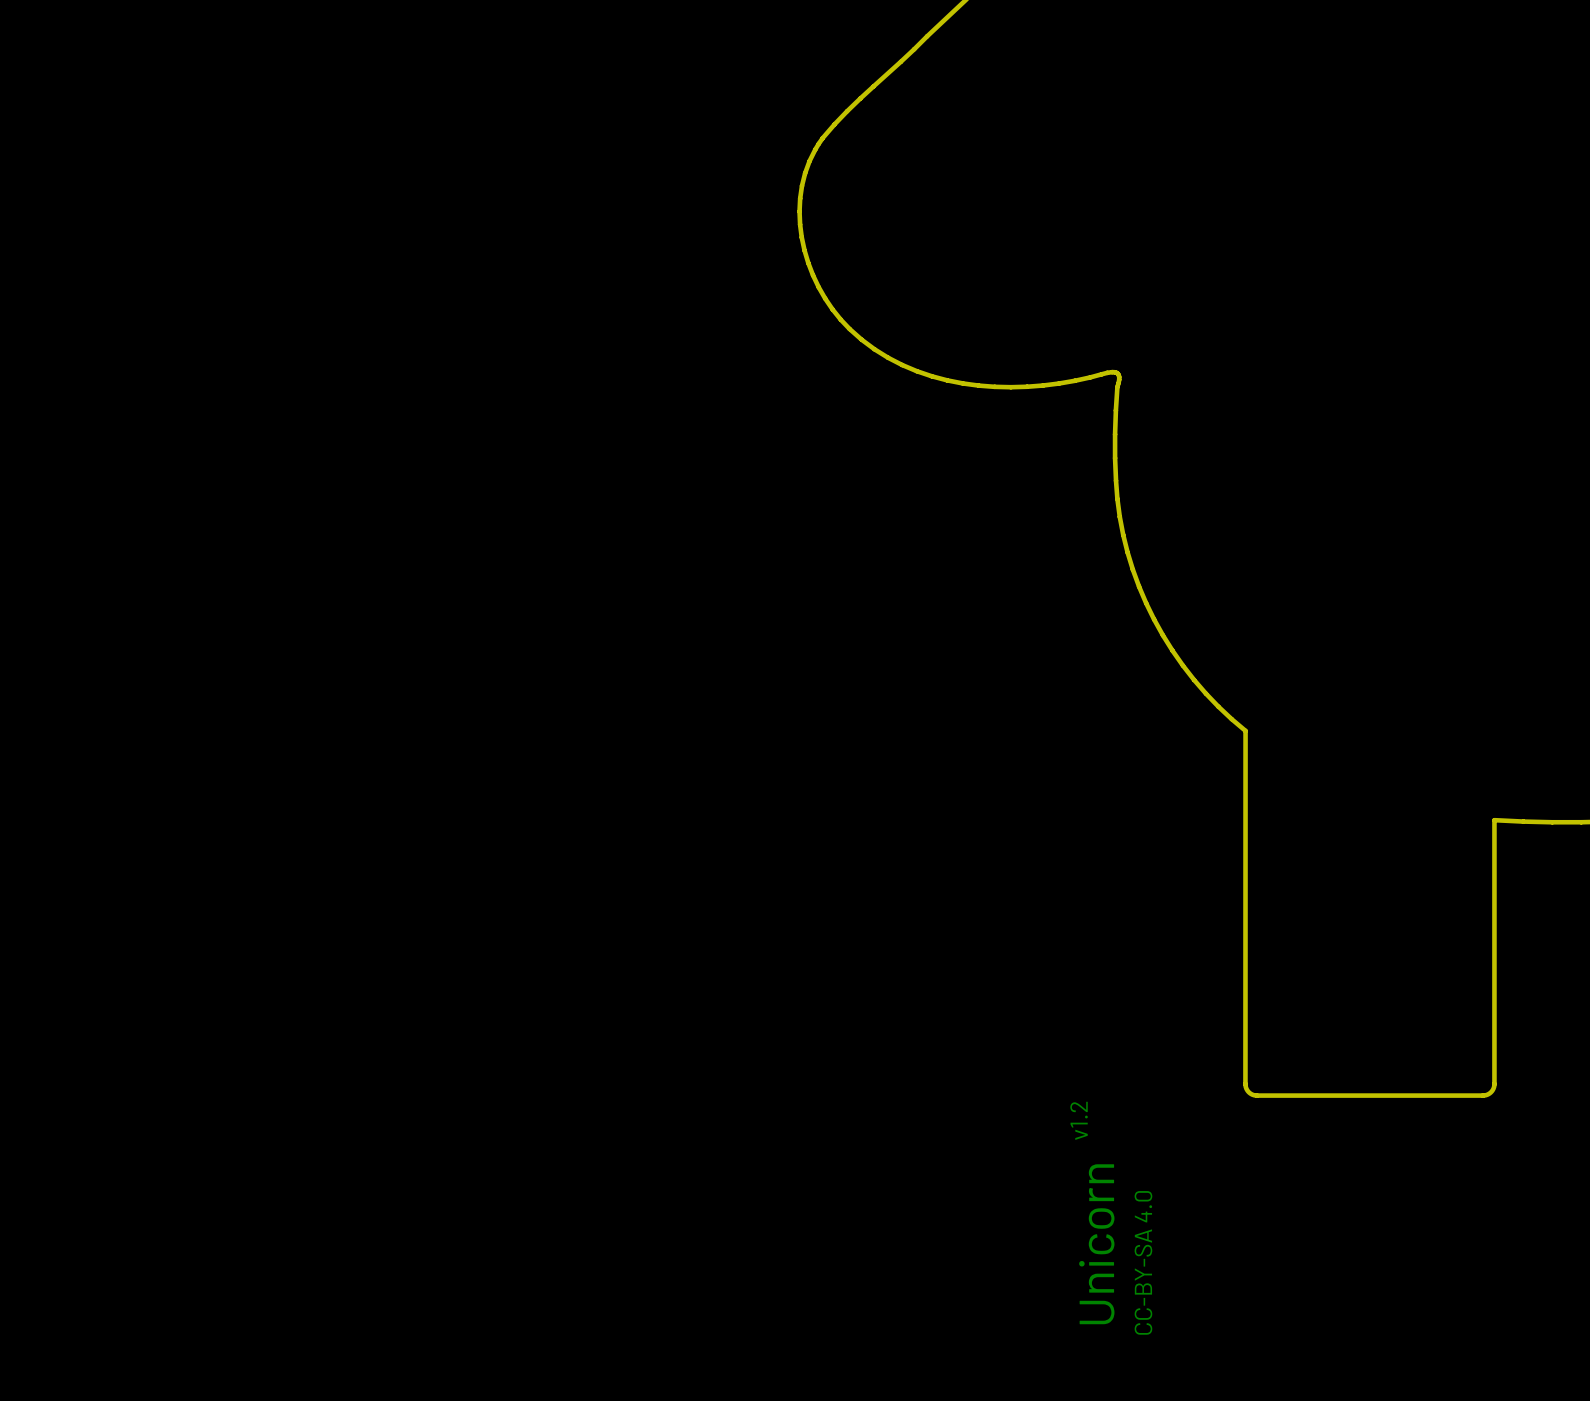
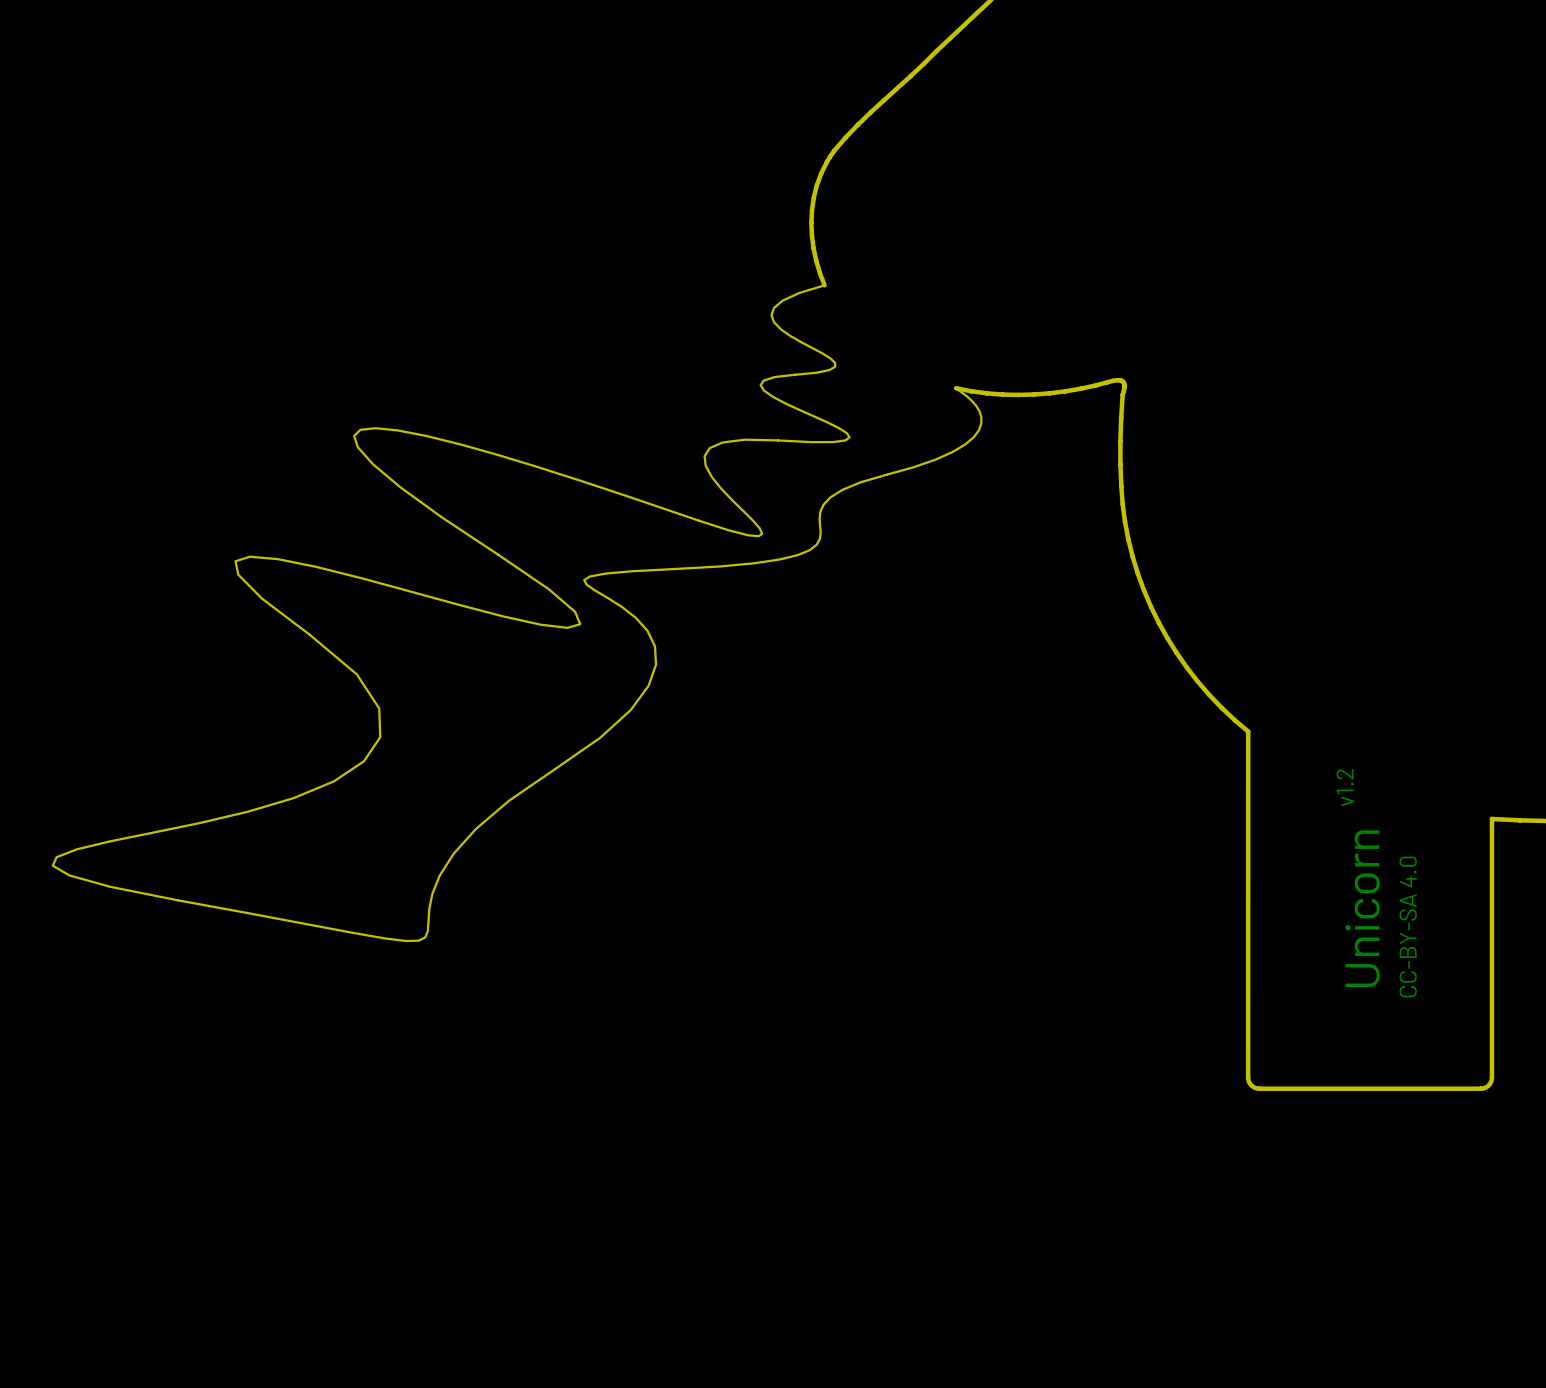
board edge: (813, 275) (832, 309) (861, 339) (902, 365) (947, 380) -> (824, 285) (782, 300) (773, 308) (771, 315) (774, 322) (780, 329) (830, 358) (835, 362) (835, 366) (816, 372) (774, 377) (763, 380) (760, 385) (764, 390) (772, 396) (839, 428) (849, 437) (845, 440) (833, 442) (745, 439) (722, 442) (709, 448) (704, 456) (705, 465) (711, 476) (759, 528) (762, 533) (758, 536) (728, 530) (579, 480) (460, 444) (397, 430) (375, 428) (360, 429) (354, 436) (357, 447) (372, 464) (400, 487) (441, 517) (549, 589) (575, 611) (580, 624) (567, 627) (540, 624) (316, 566) (278, 559) (249, 556) (235, 561) (238, 574) (261, 598) (309, 634) (356, 674) (379, 708) (380, 737) (363, 761) (333, 781) (293, 798) (247, 811) (76, 849) (56, 857) (52, 865) (69, 875) (109, 886) (178, 900) (385, 938) (406, 941) (418, 940) (425, 937) (432, 894) (439, 875) (453, 853) (476, 828) (509, 800) (600, 737) (630, 709) (648, 685) (656, 664) (654, 646) (647, 630) (635, 617) (586, 584) (584, 580) (589, 576) (605, 573) (754, 563) (779, 559) (809, 550) (816, 544) (819, 538) (820, 511) (823, 504) (830, 497) (860, 482) (935, 459) (952, 452) (973, 437) (981, 423) (979, 411) (972, 401) (956, 388)
text position: v1.2 (1079, 1120) -> v1.2 (1345, 787)
text position: Unicorn (1096, 1244) -> Unicorn (1362, 908)
text position: CC-BY-SA 4.0 (1143, 1262) -> CC-BY-SA 4.0 (1408, 926)

